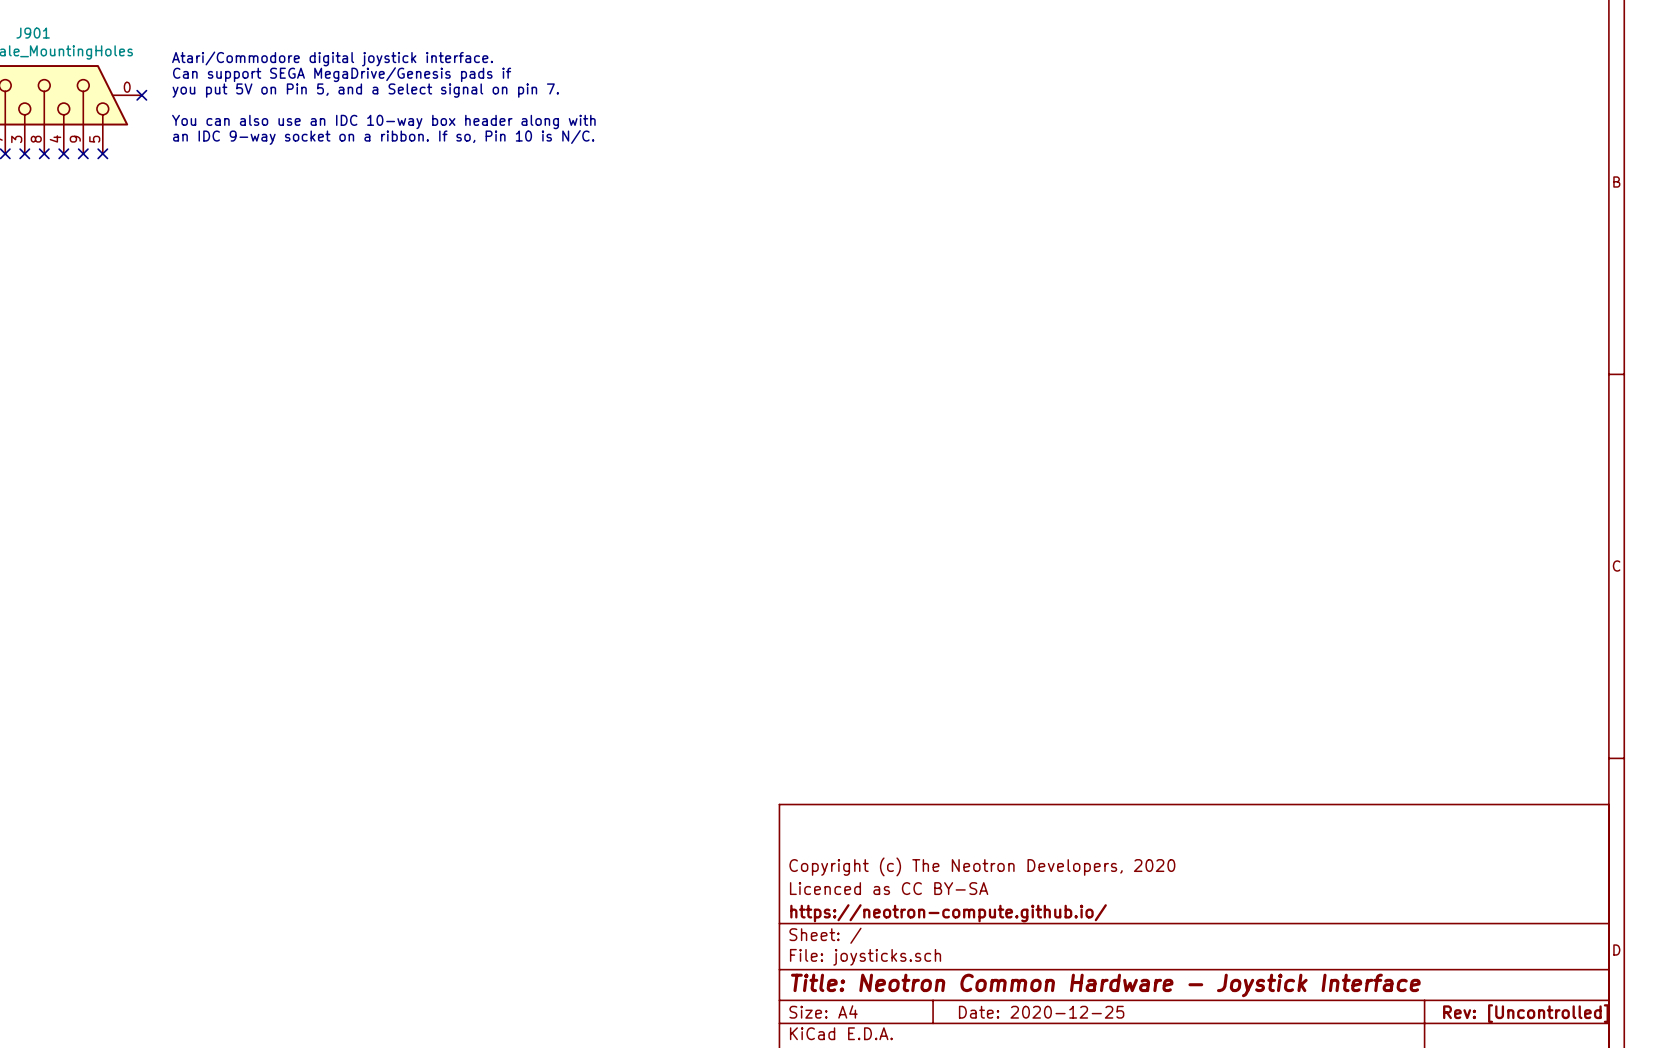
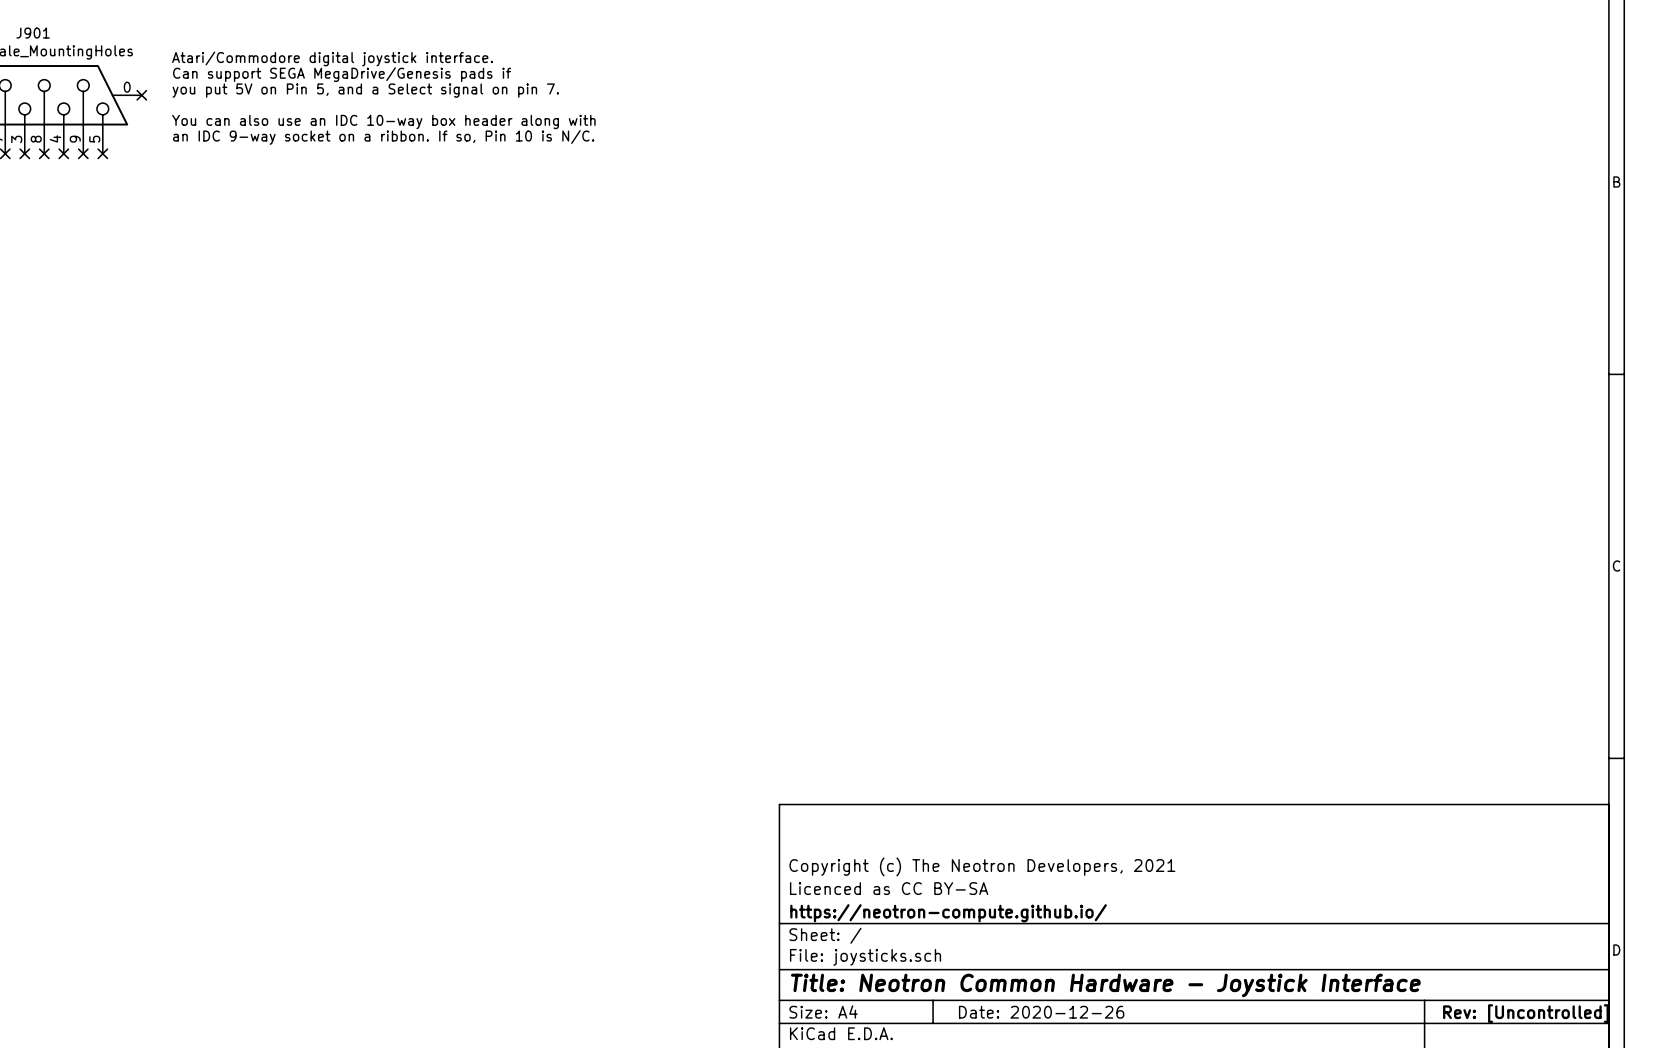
title block: Copyright (c) The Neotron Developers, 2020 (982, 866) -> Copyright (c) The Neotron Developers, 2021 (982, 866)
title block: Date: 2020-12-25 (1041, 1012) -> Date: 2020-12-26 (1041, 1012)

